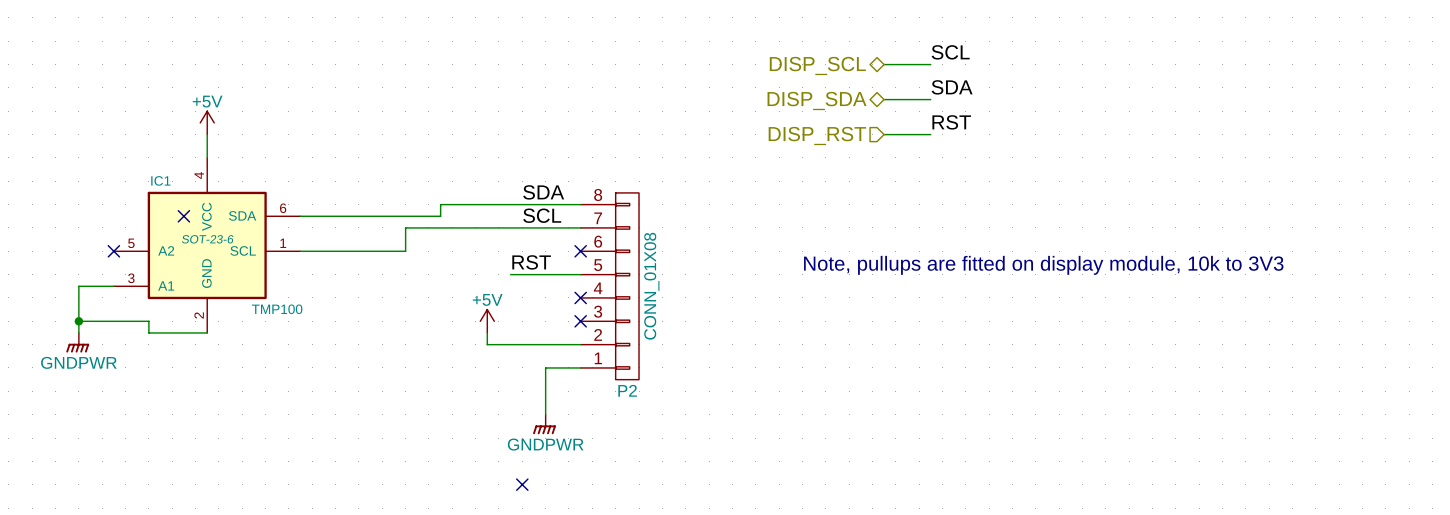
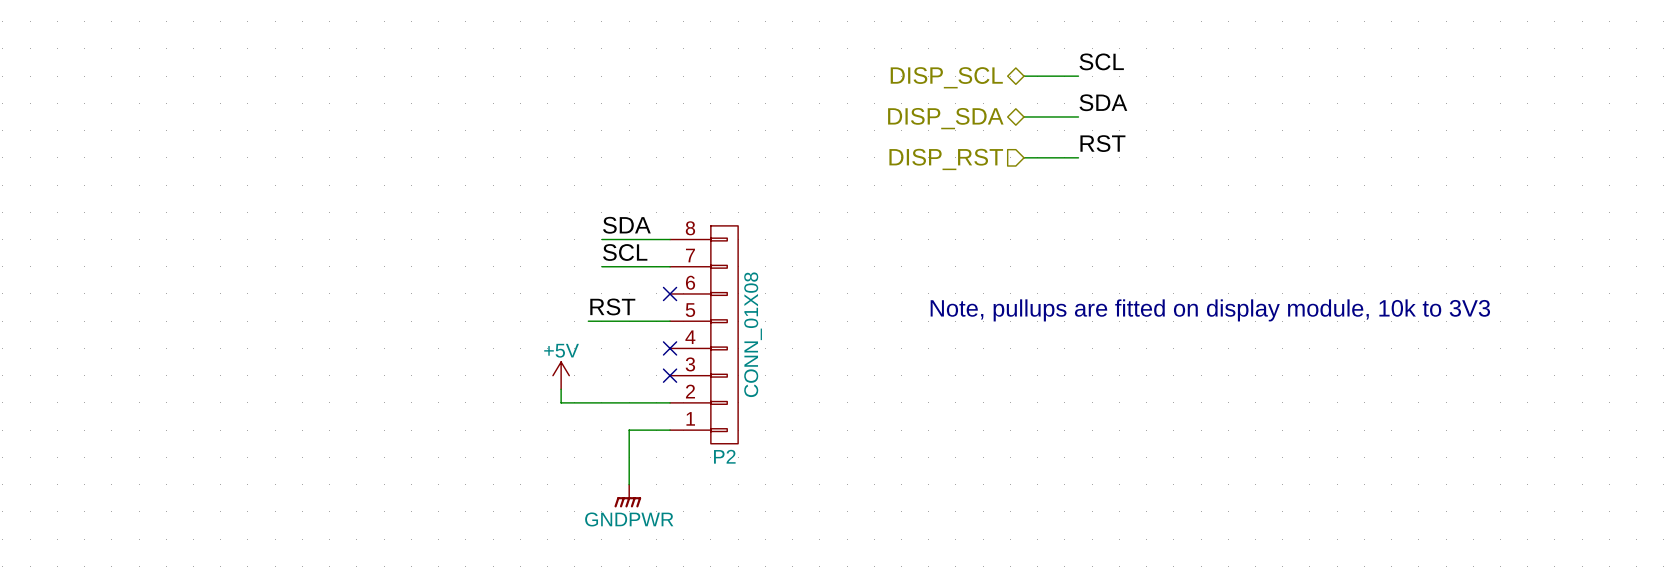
power symbol: +5V (207, 122) -> none
wire: (207, 134) (207, 157) -> none
wire: (522, 204) (440, 204) (440, 216) (300, 216) -> none
no-connect mark: (183, 216) -> none
wire: (522, 227) (405, 227) (405, 251) (300, 251) -> none
IC1: TMP100 (207, 245) -> none
no-connect mark: (113, 251) -> none
wire: (113, 286) (78, 286) (78, 332) -> none
wire: (78, 321) (148, 321) (148, 332) (207, 332) -> none
junction: (78, 321) -> none
power symbol: GNDPWR (77, 342) -> none
no-connect mark: (522, 484) -> none

